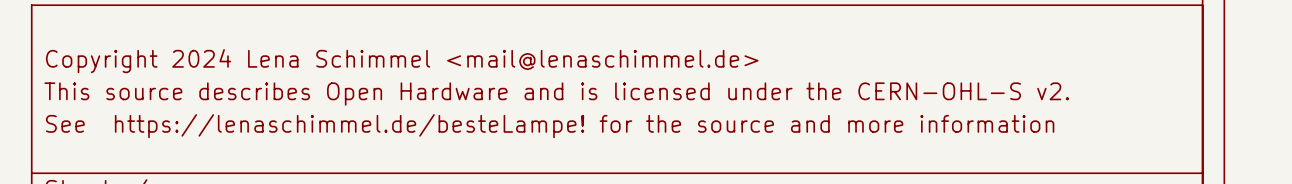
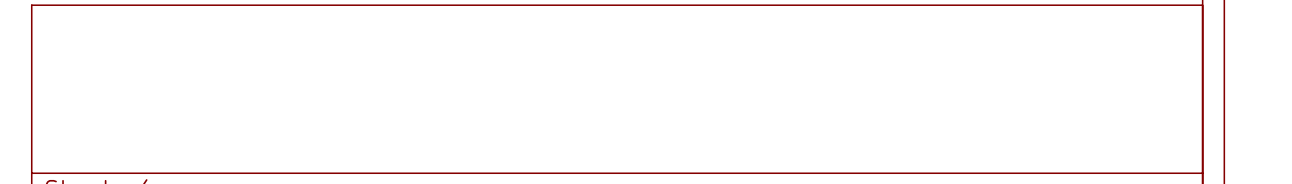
title block: Copyright 2024 Lena Schimmel <mail@lenaschimmel.de> (402, 61) -> none
title block: This source describes Open Hardware and is licensed under the CERN-OHL-S v2. (556, 94) -> none
title block: See https://lenaschimmel.de/besteLampe! for the source and more information (550, 126) -> none

